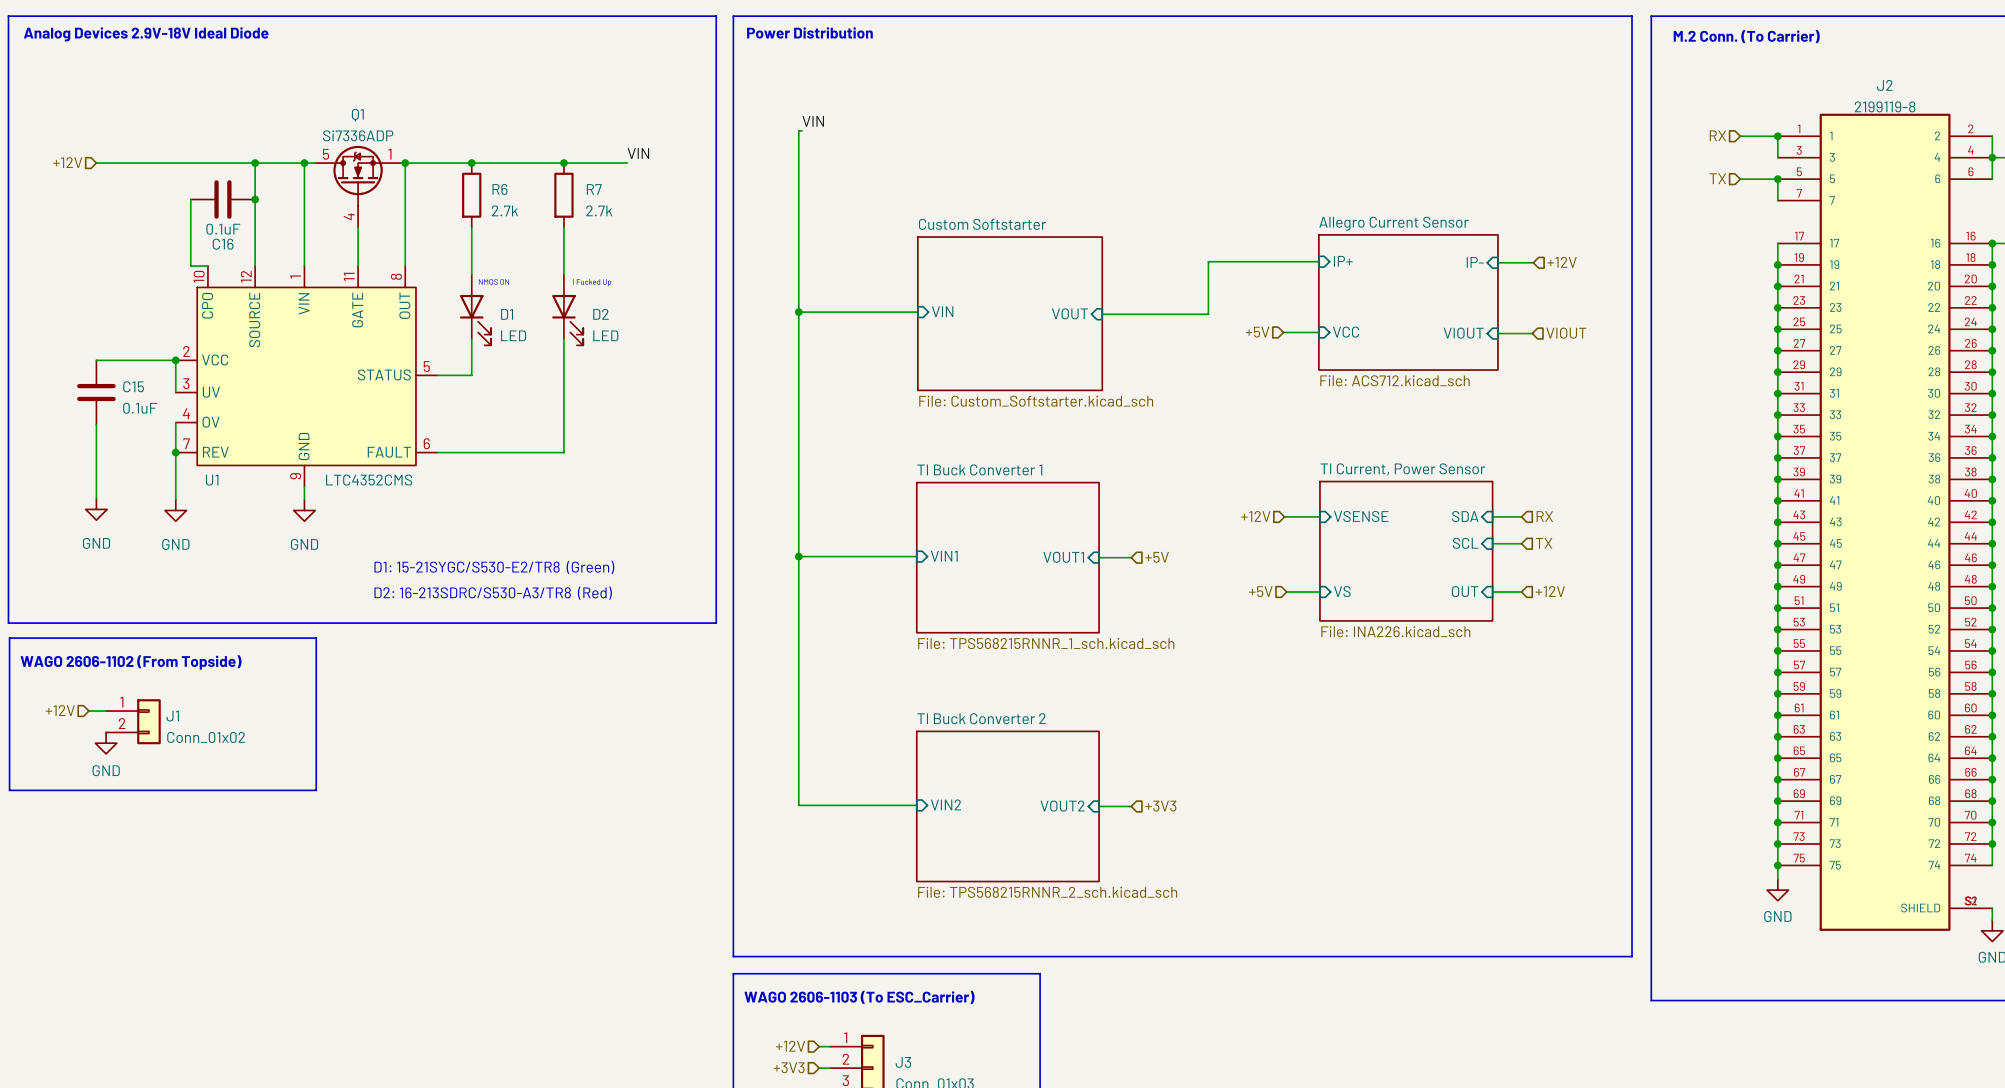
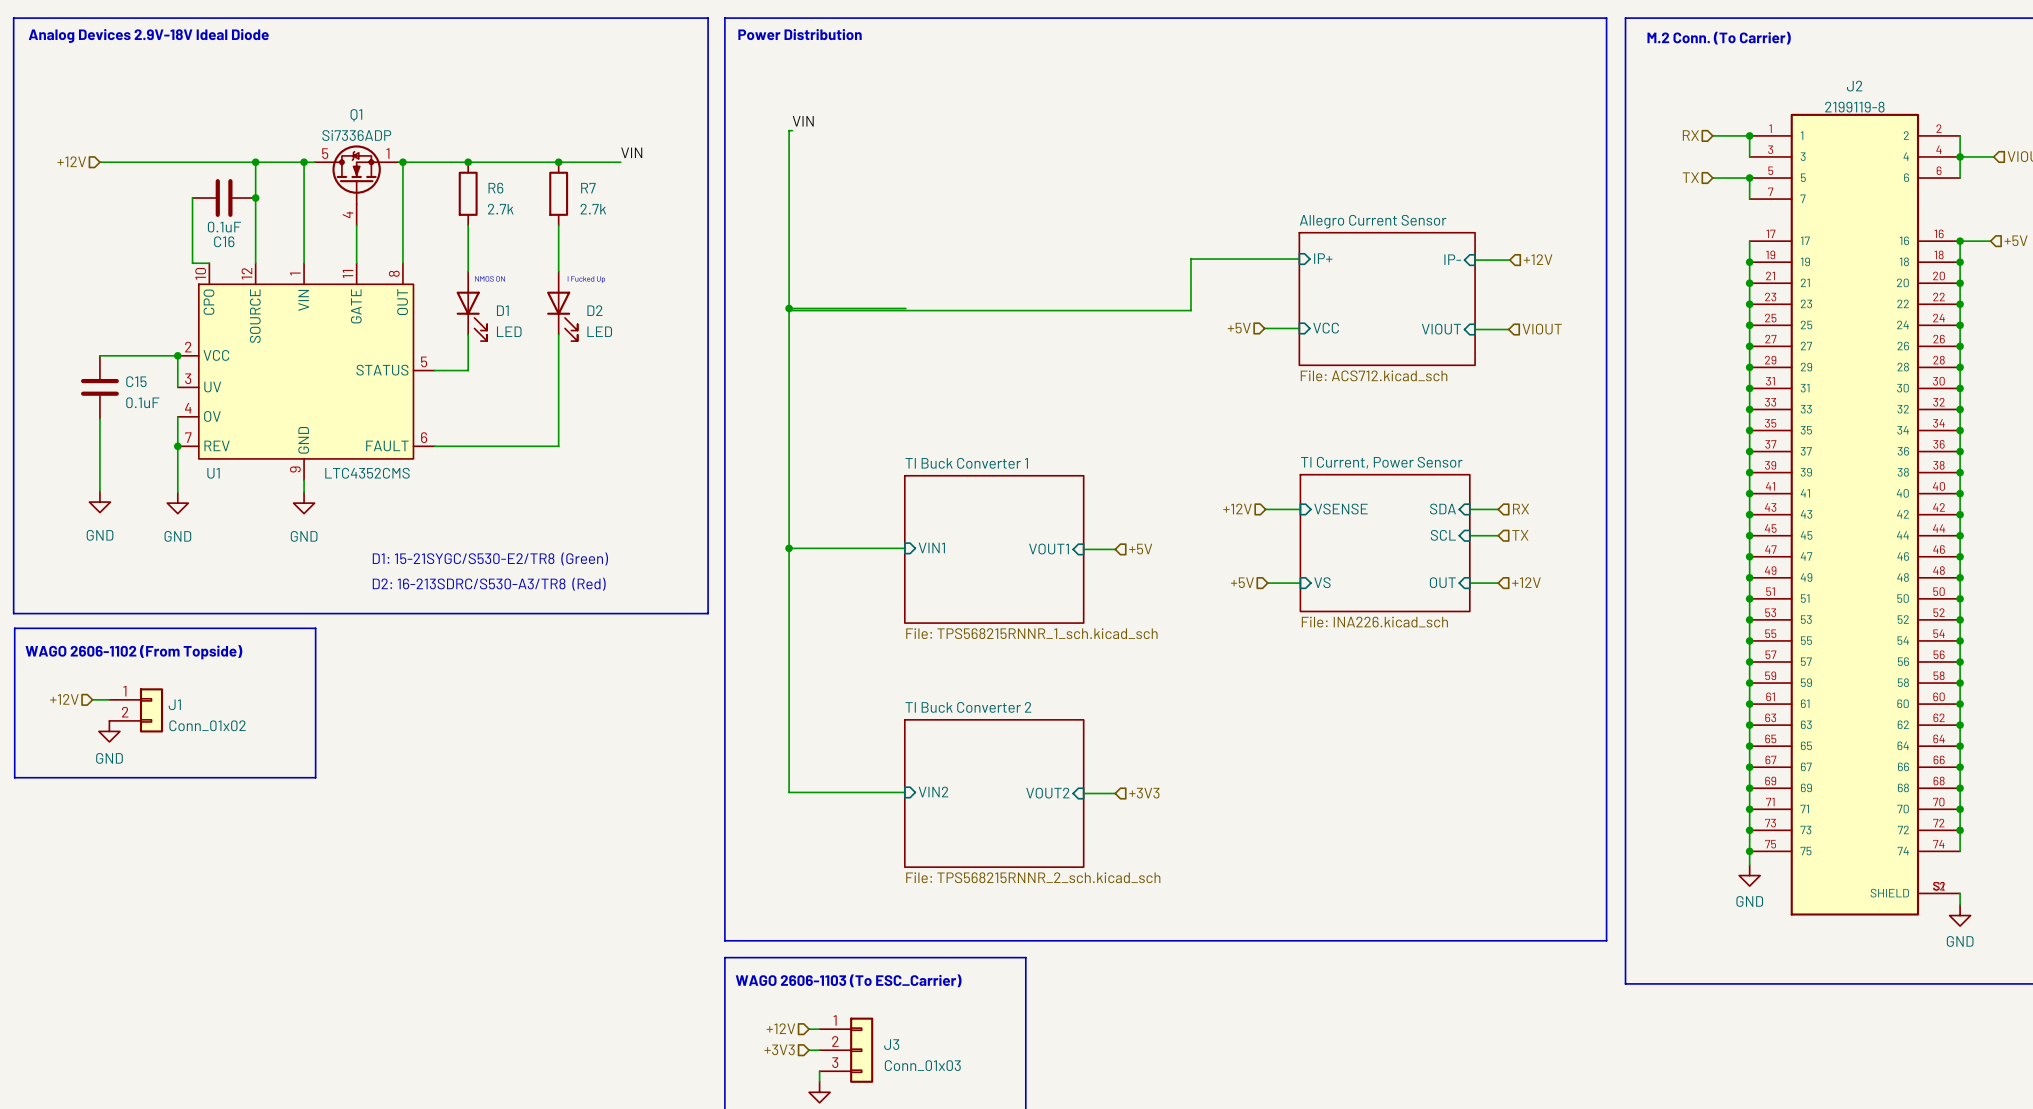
sheet pin: VIN (942, 311) -> none
sheet Custom Softstarter: File: Custom_Softstarter.kicad_sch (1010, 313) -> none
sheet pin: VOUT (1069, 313) -> none
wire: none -> (789, 310) (1086, 310)

